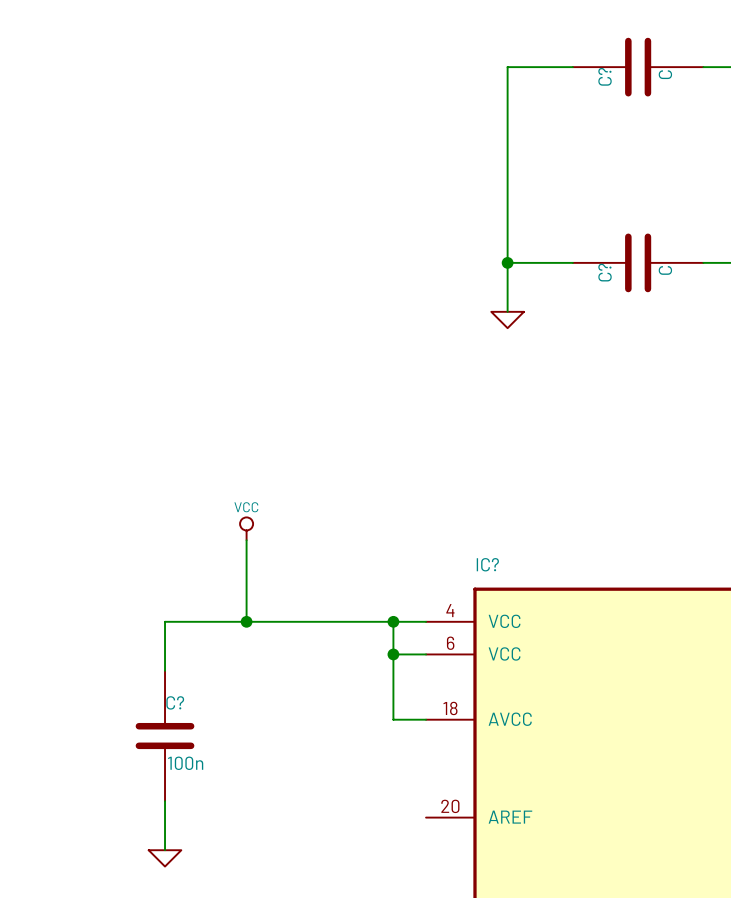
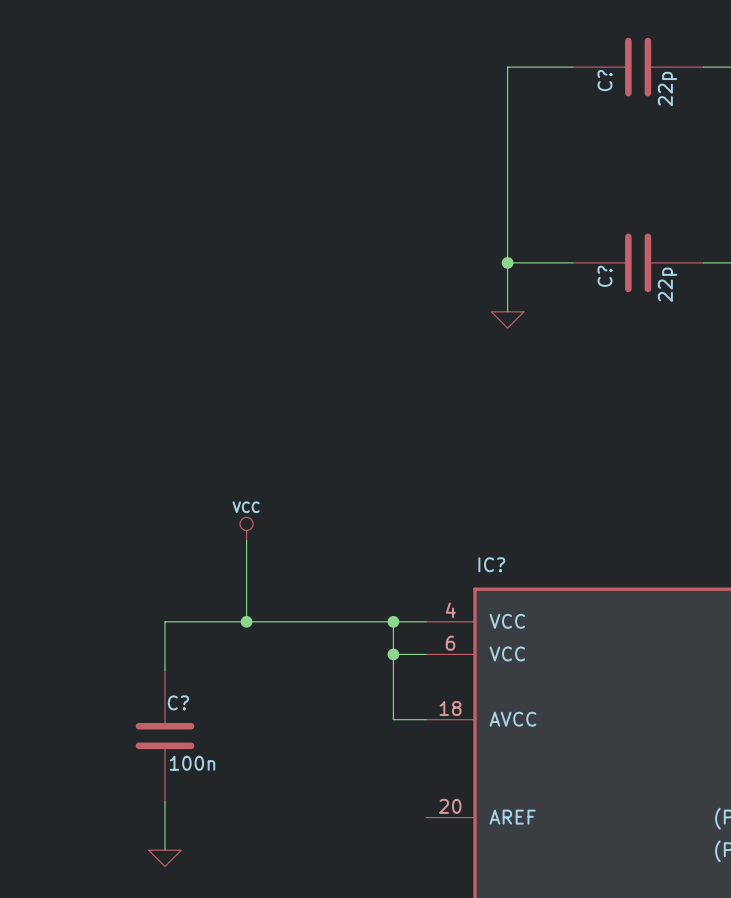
C? value: C (665, 74) -> 22p (667, 89)
C? value: C (665, 270) -> 22p (667, 284)

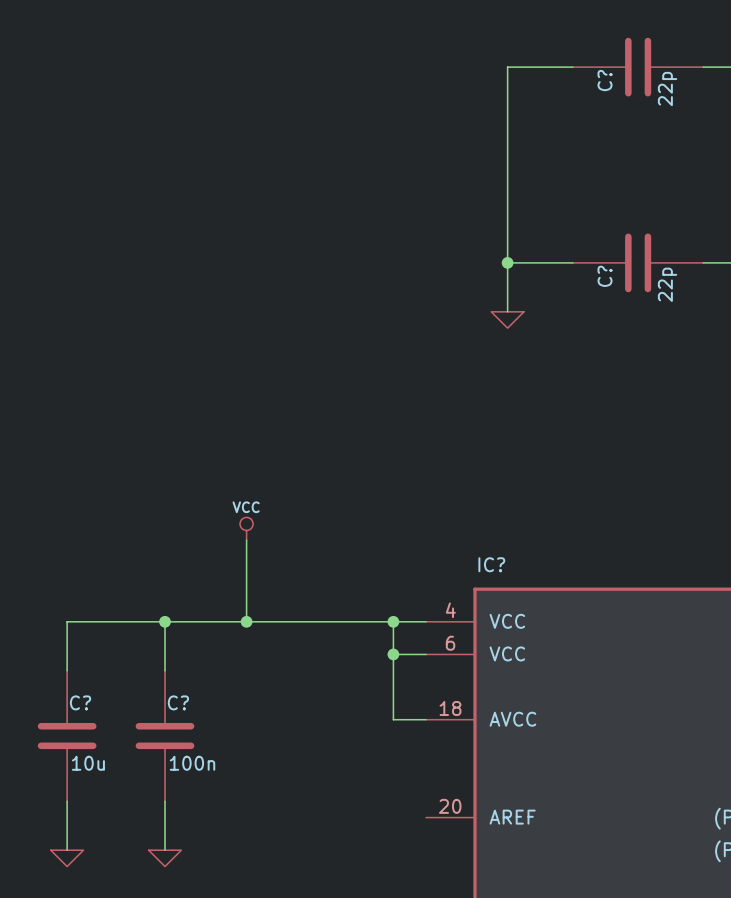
wire: none -> (165, 621) (67, 621) (67, 670)
junction: none -> (165, 621)
C?: none -> 10u (67, 736)
wire: none -> (67, 801) (67, 850)
power symbol: none -> (67, 858)

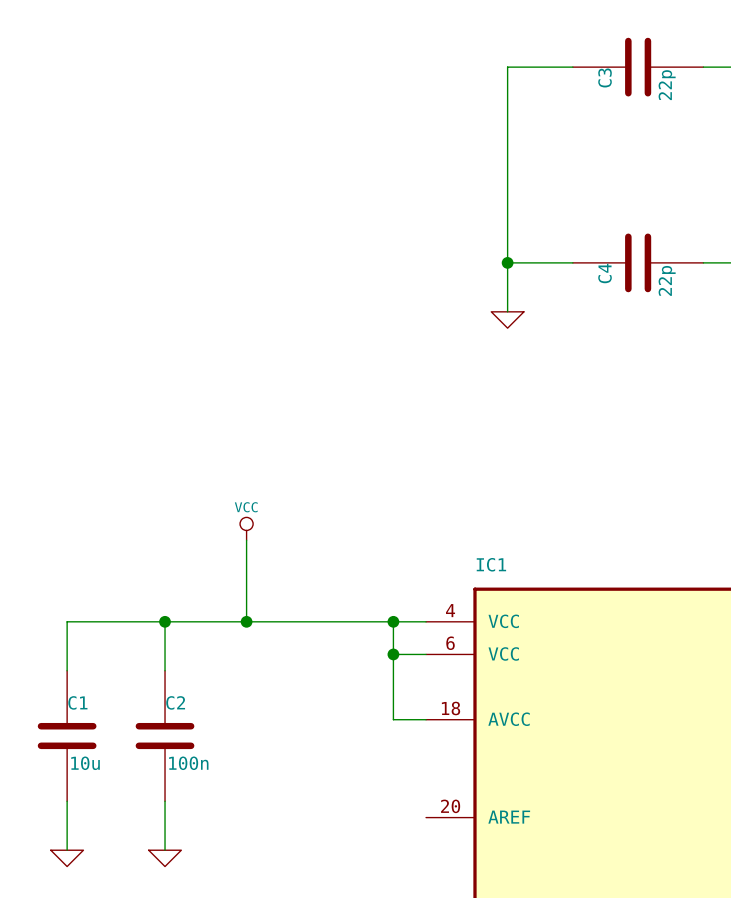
C? name: C? (605, 80) -> C3 (605, 77)
C? name: C? (605, 276) -> C4 (605, 273)
IC? name: IC? (491, 564) -> IC1 (491, 564)
C? name: C? (80, 702) -> C1 (77, 702)
C? name: C? (178, 702) -> C2 (175, 702)

